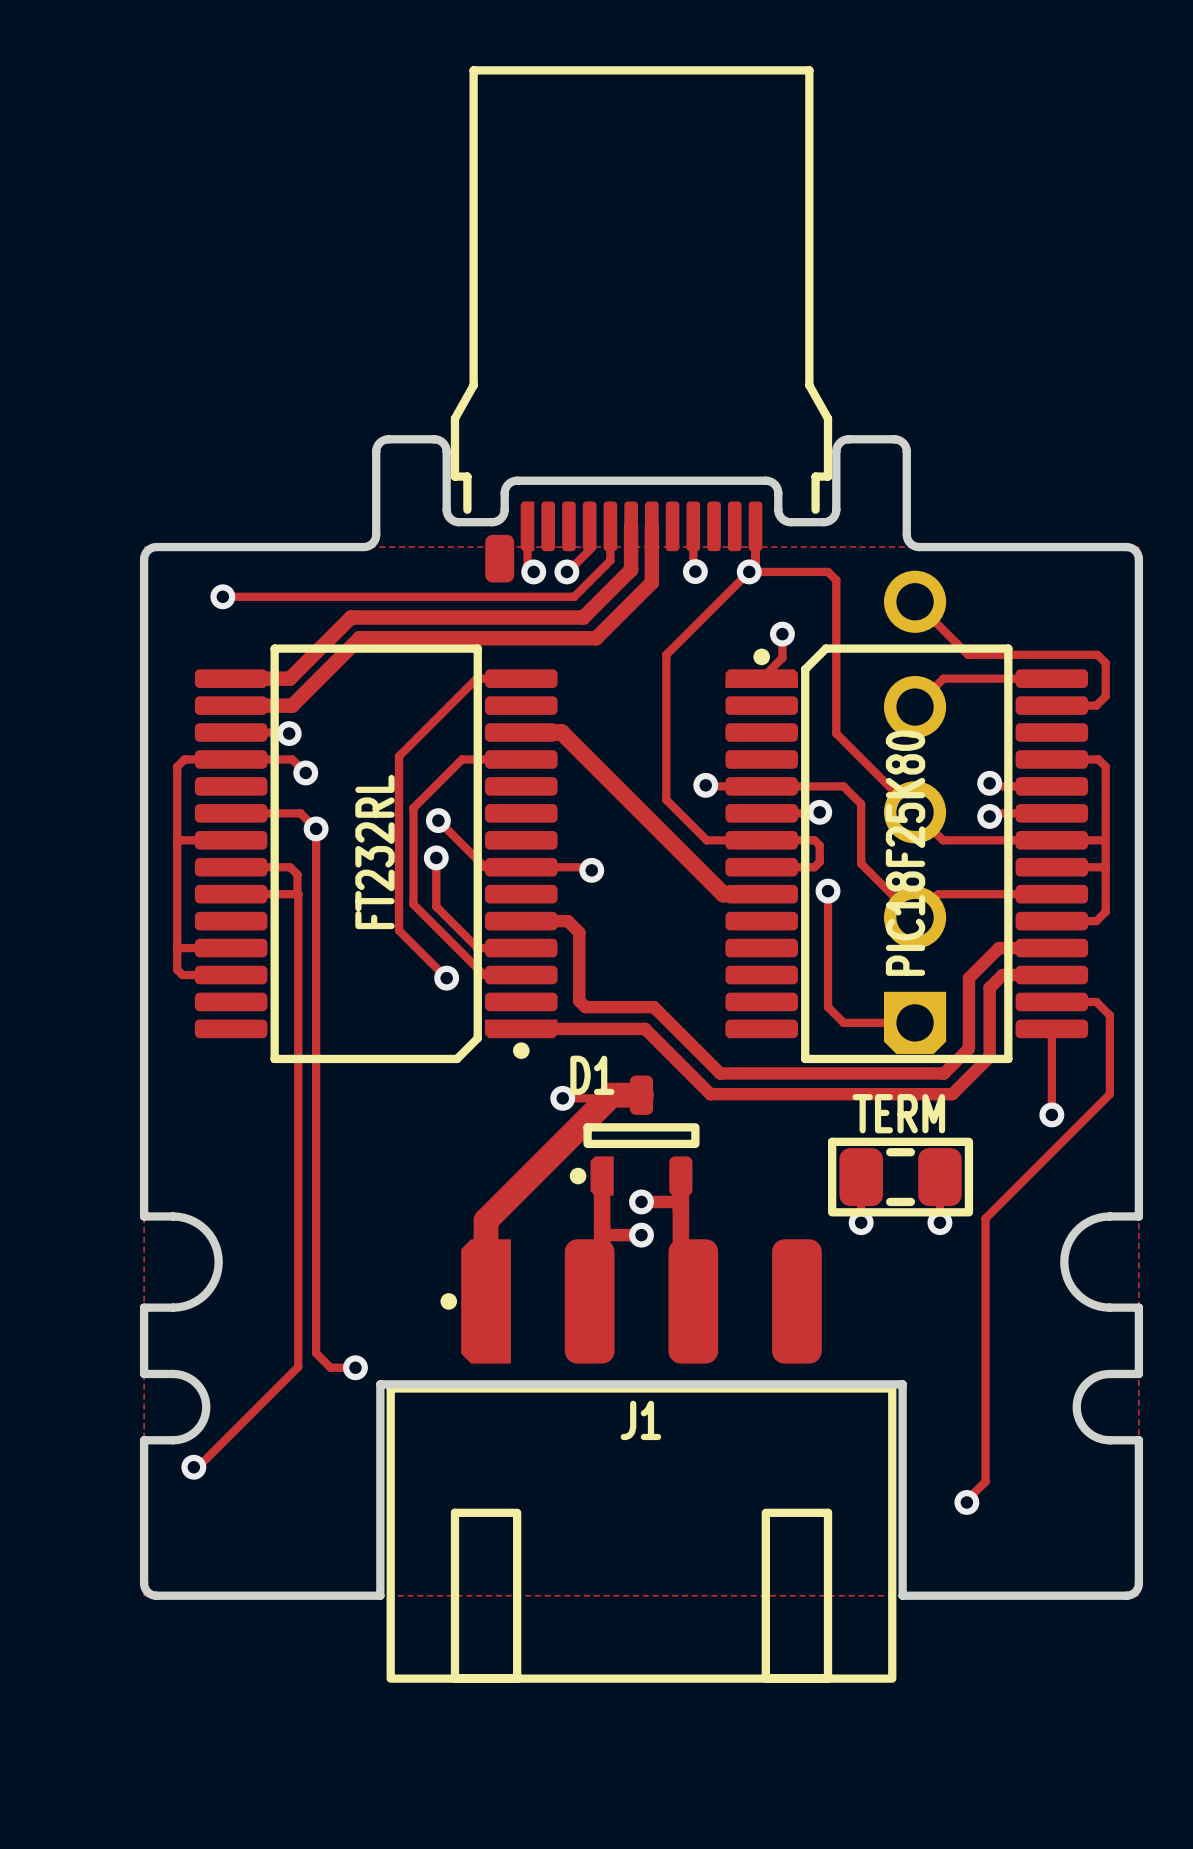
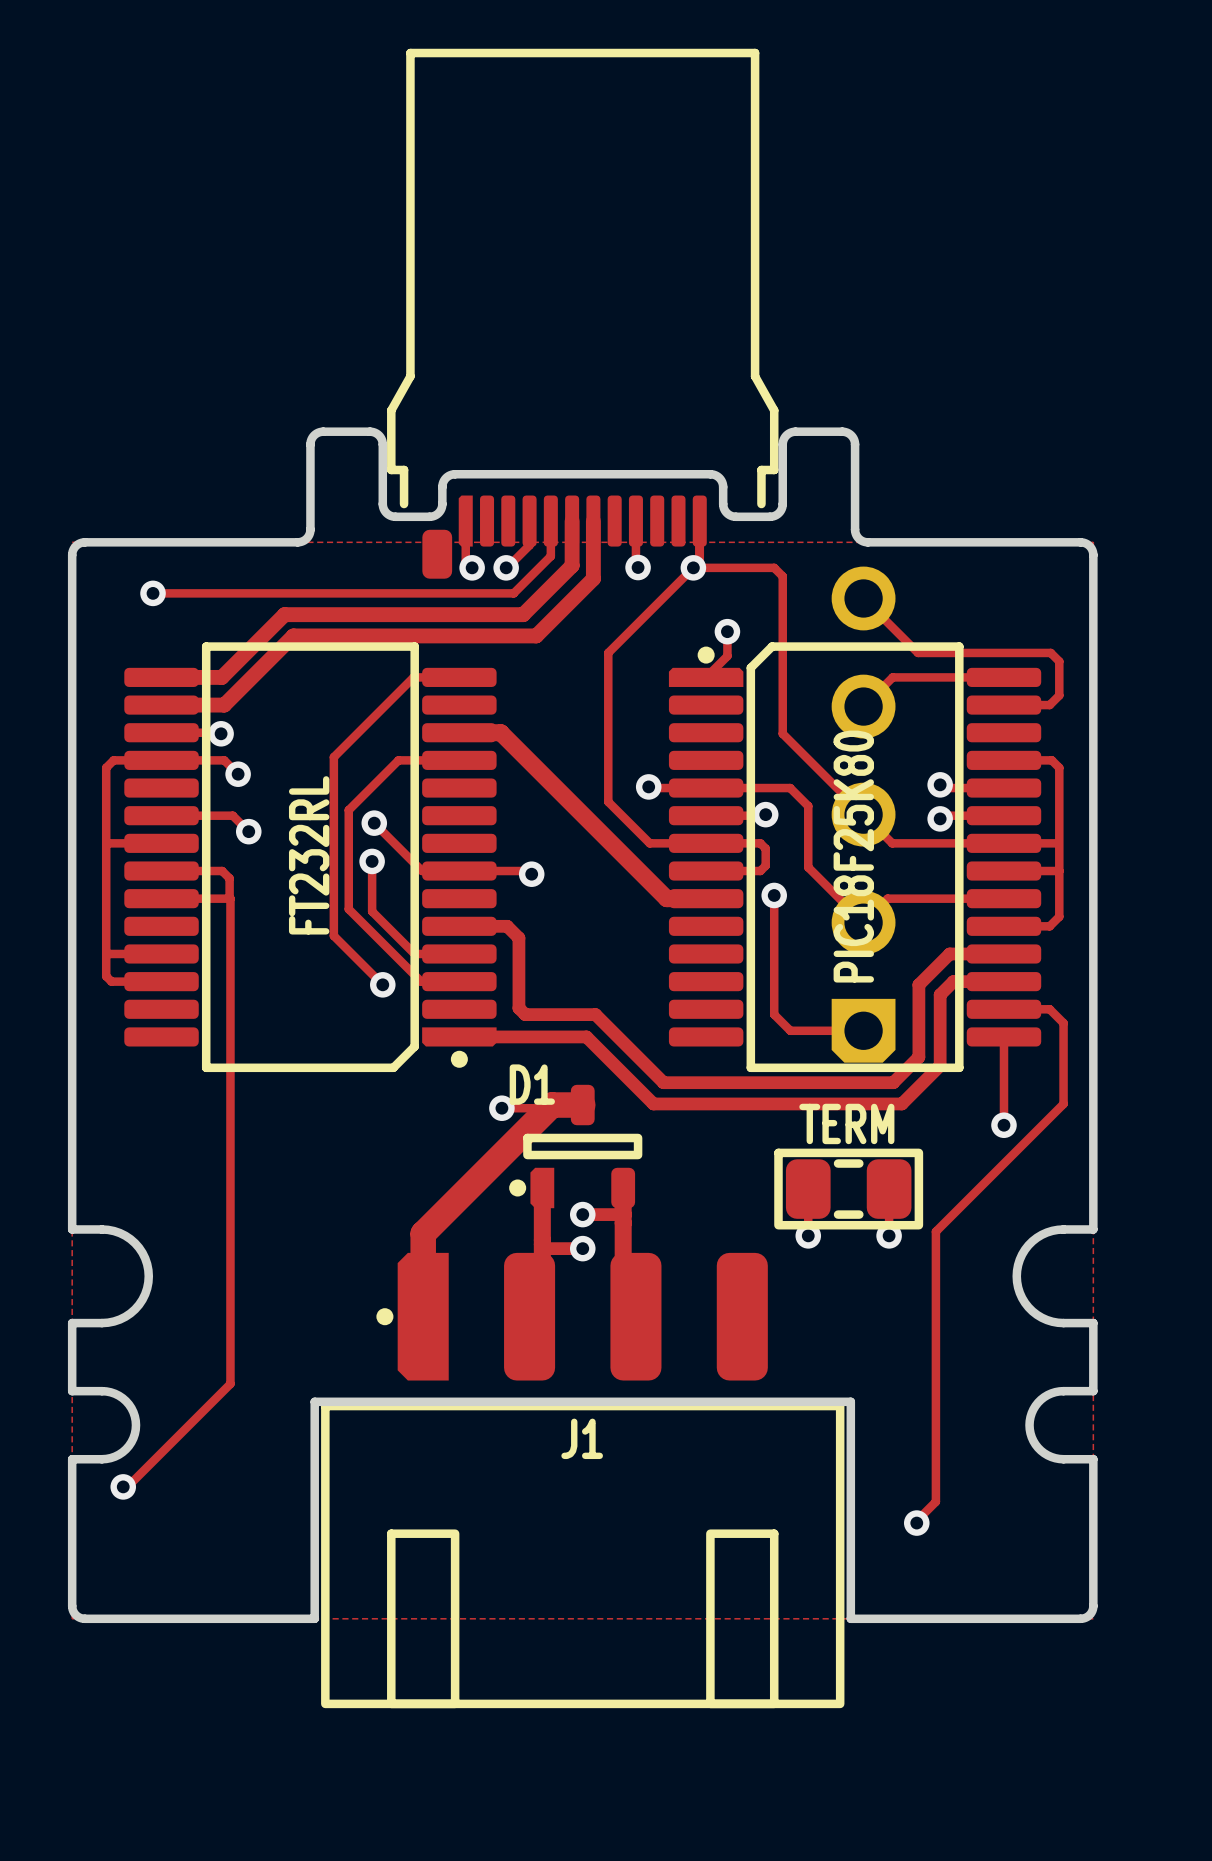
track: (316, 828) (316, 1353) (330, 1367) (355, 1367) -> none
via: (355, 1367) -> none

